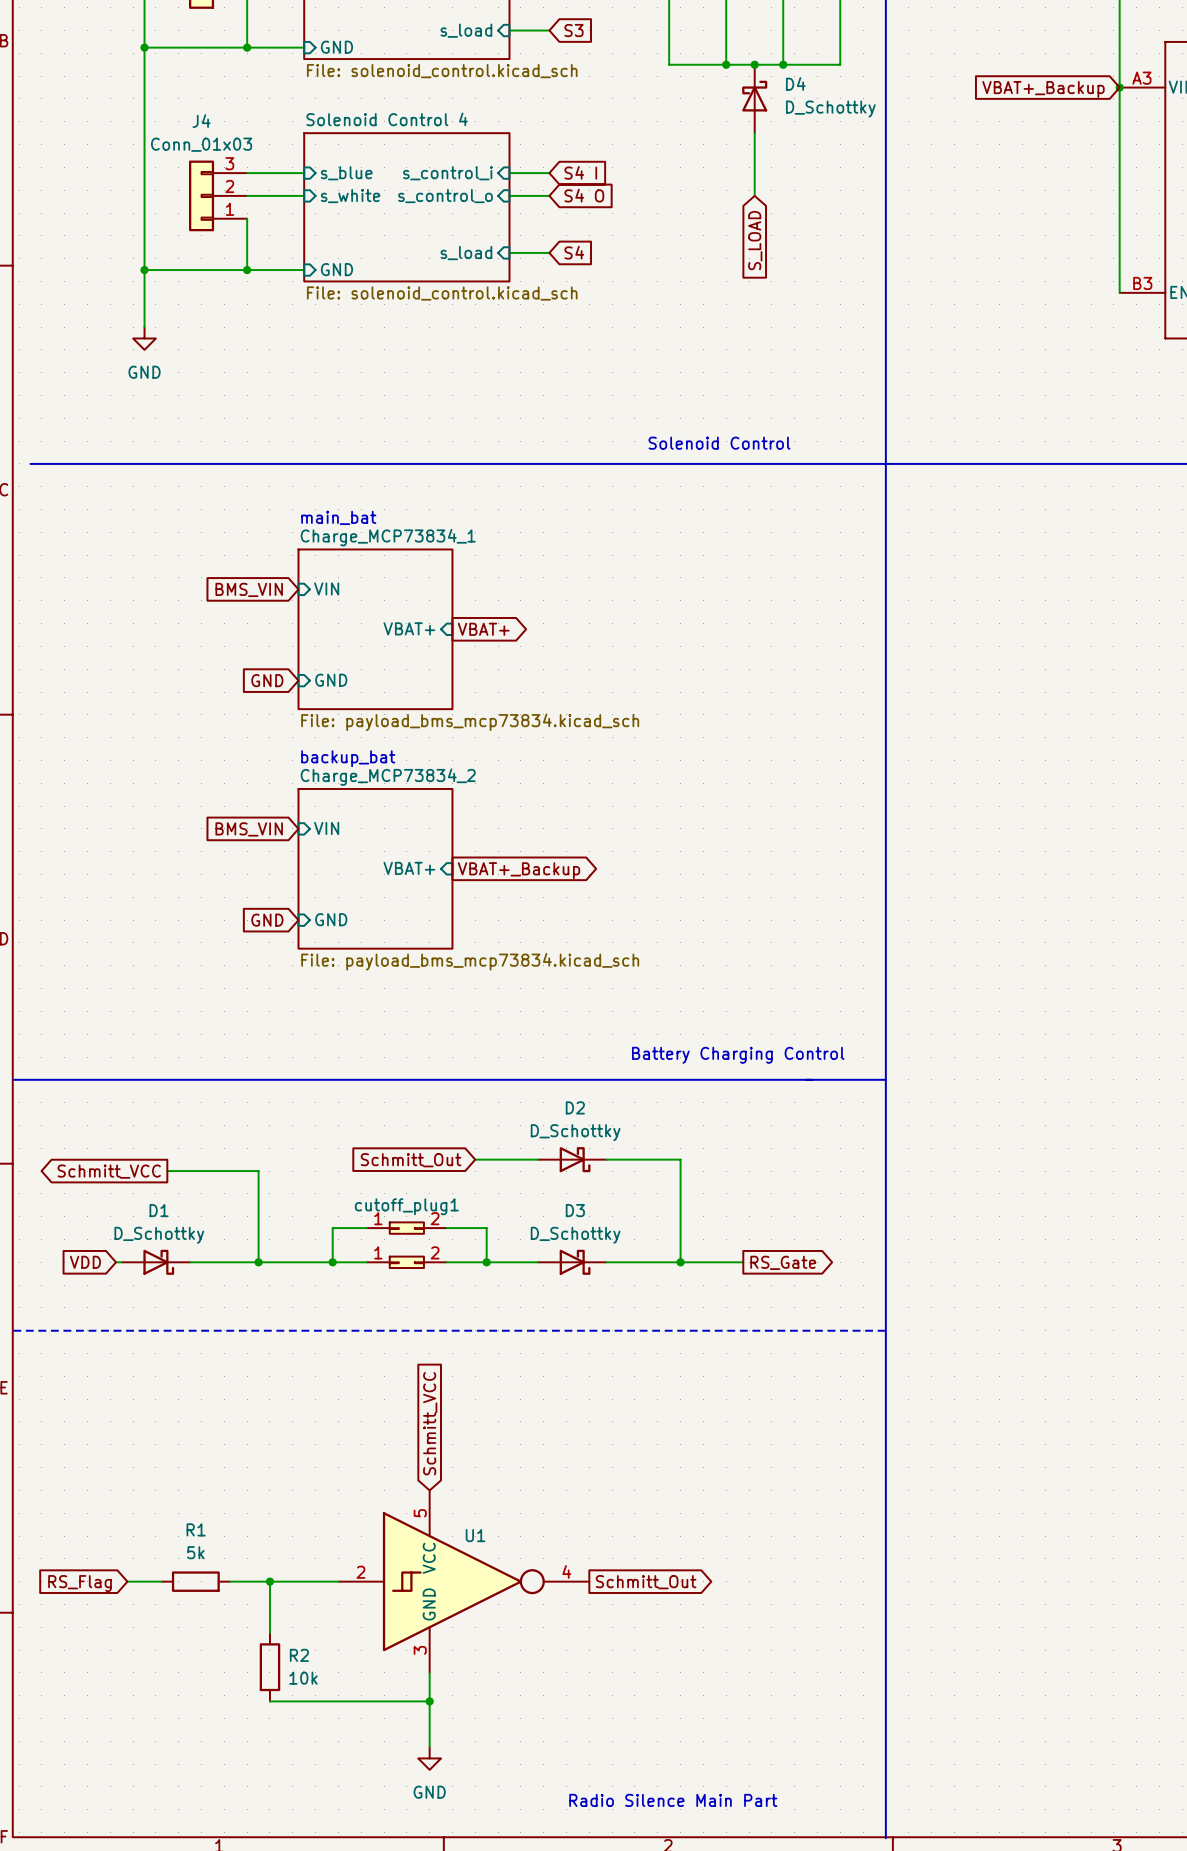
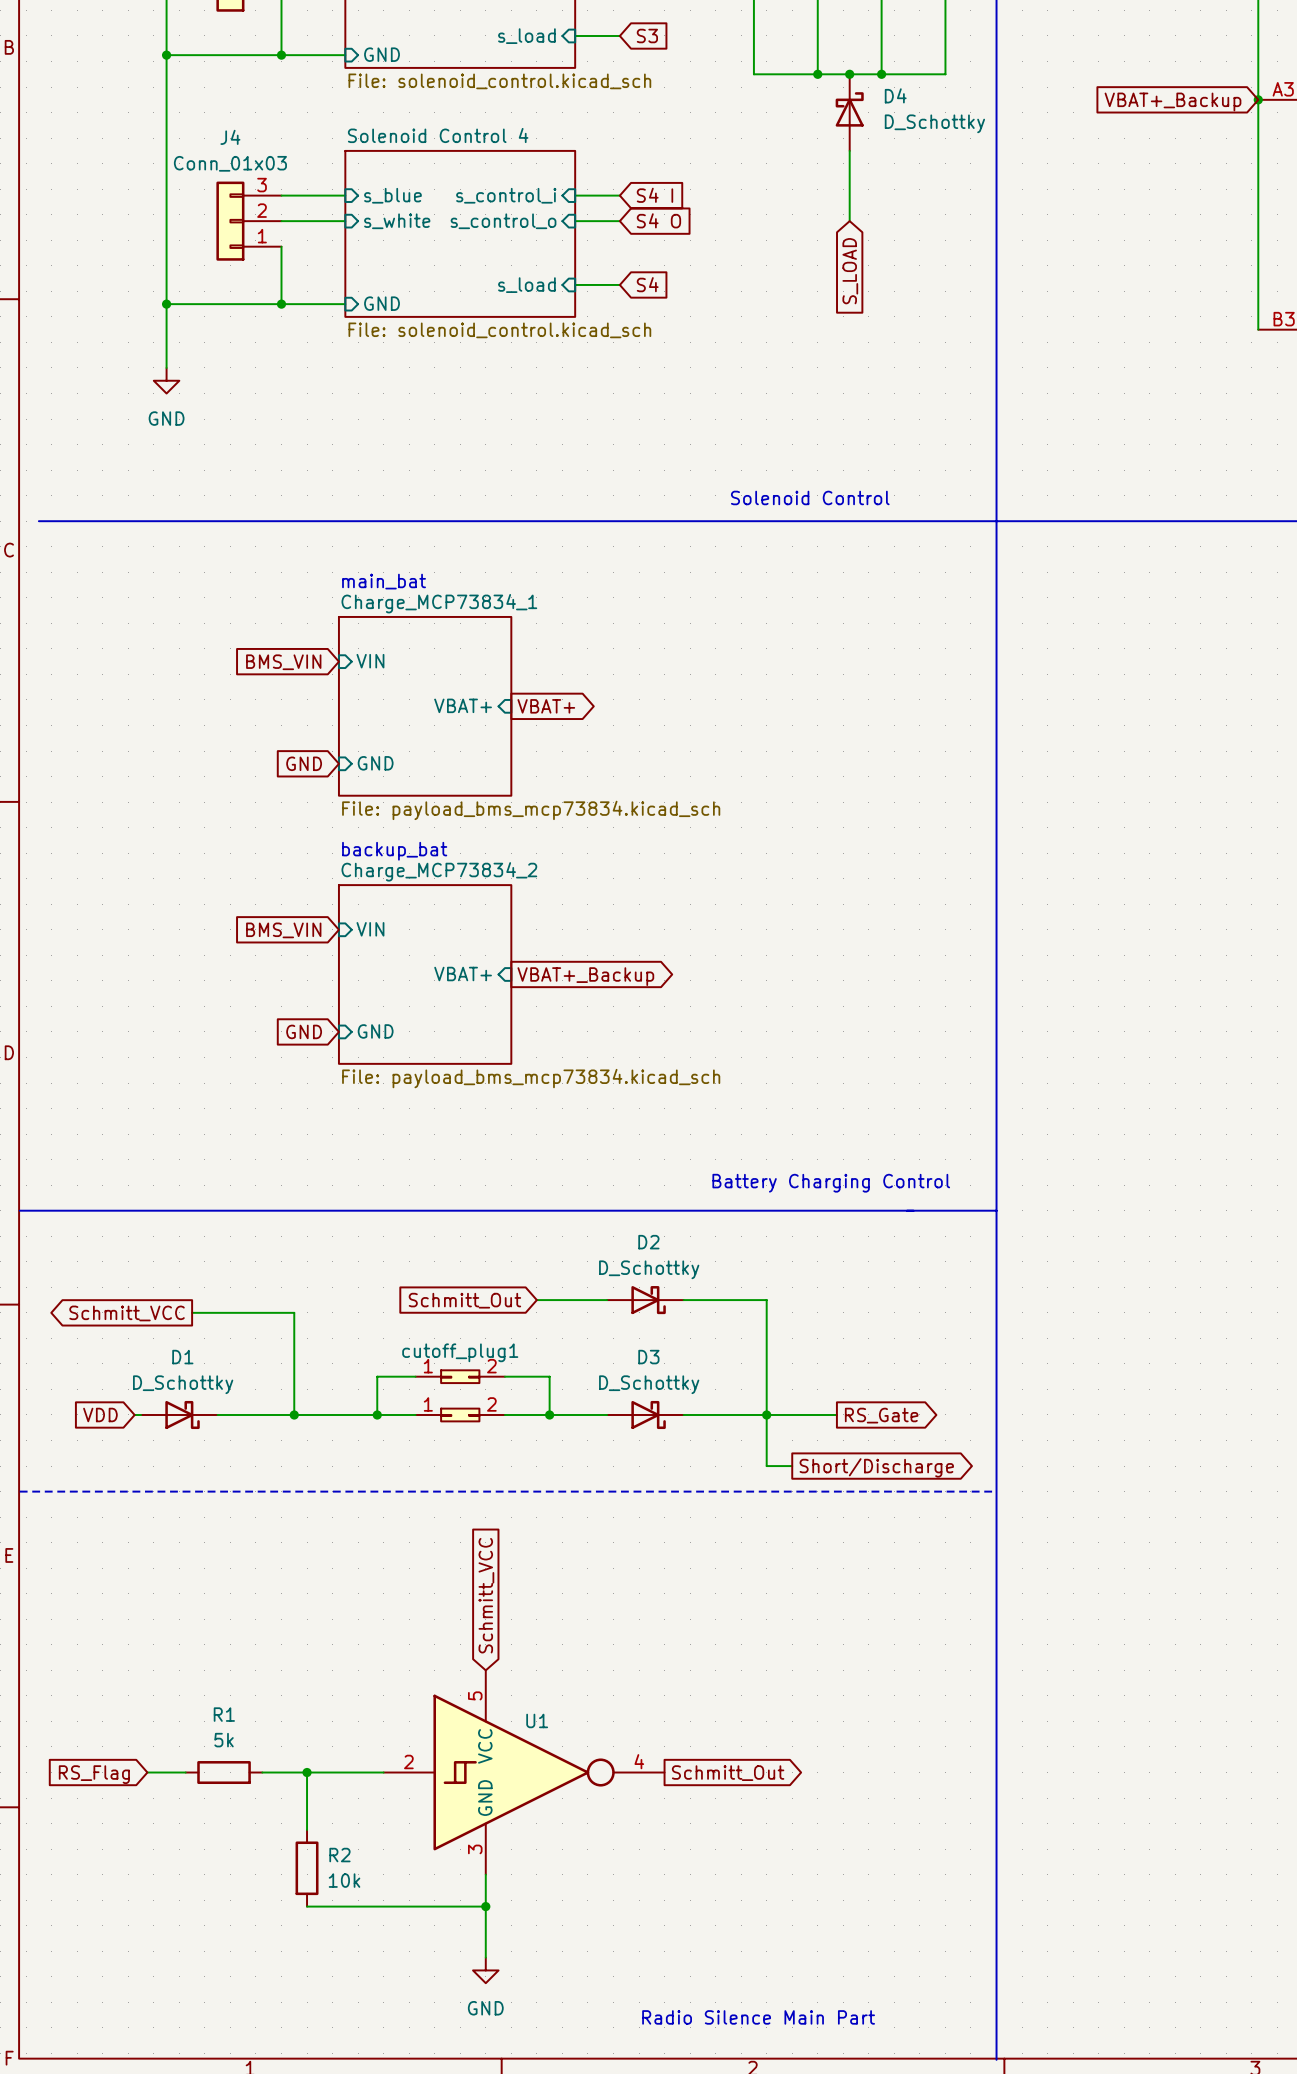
wire: none -> (766, 1414) (766, 1466) (792, 1466)
global label: none -> Short/Discharge (876, 1467)

